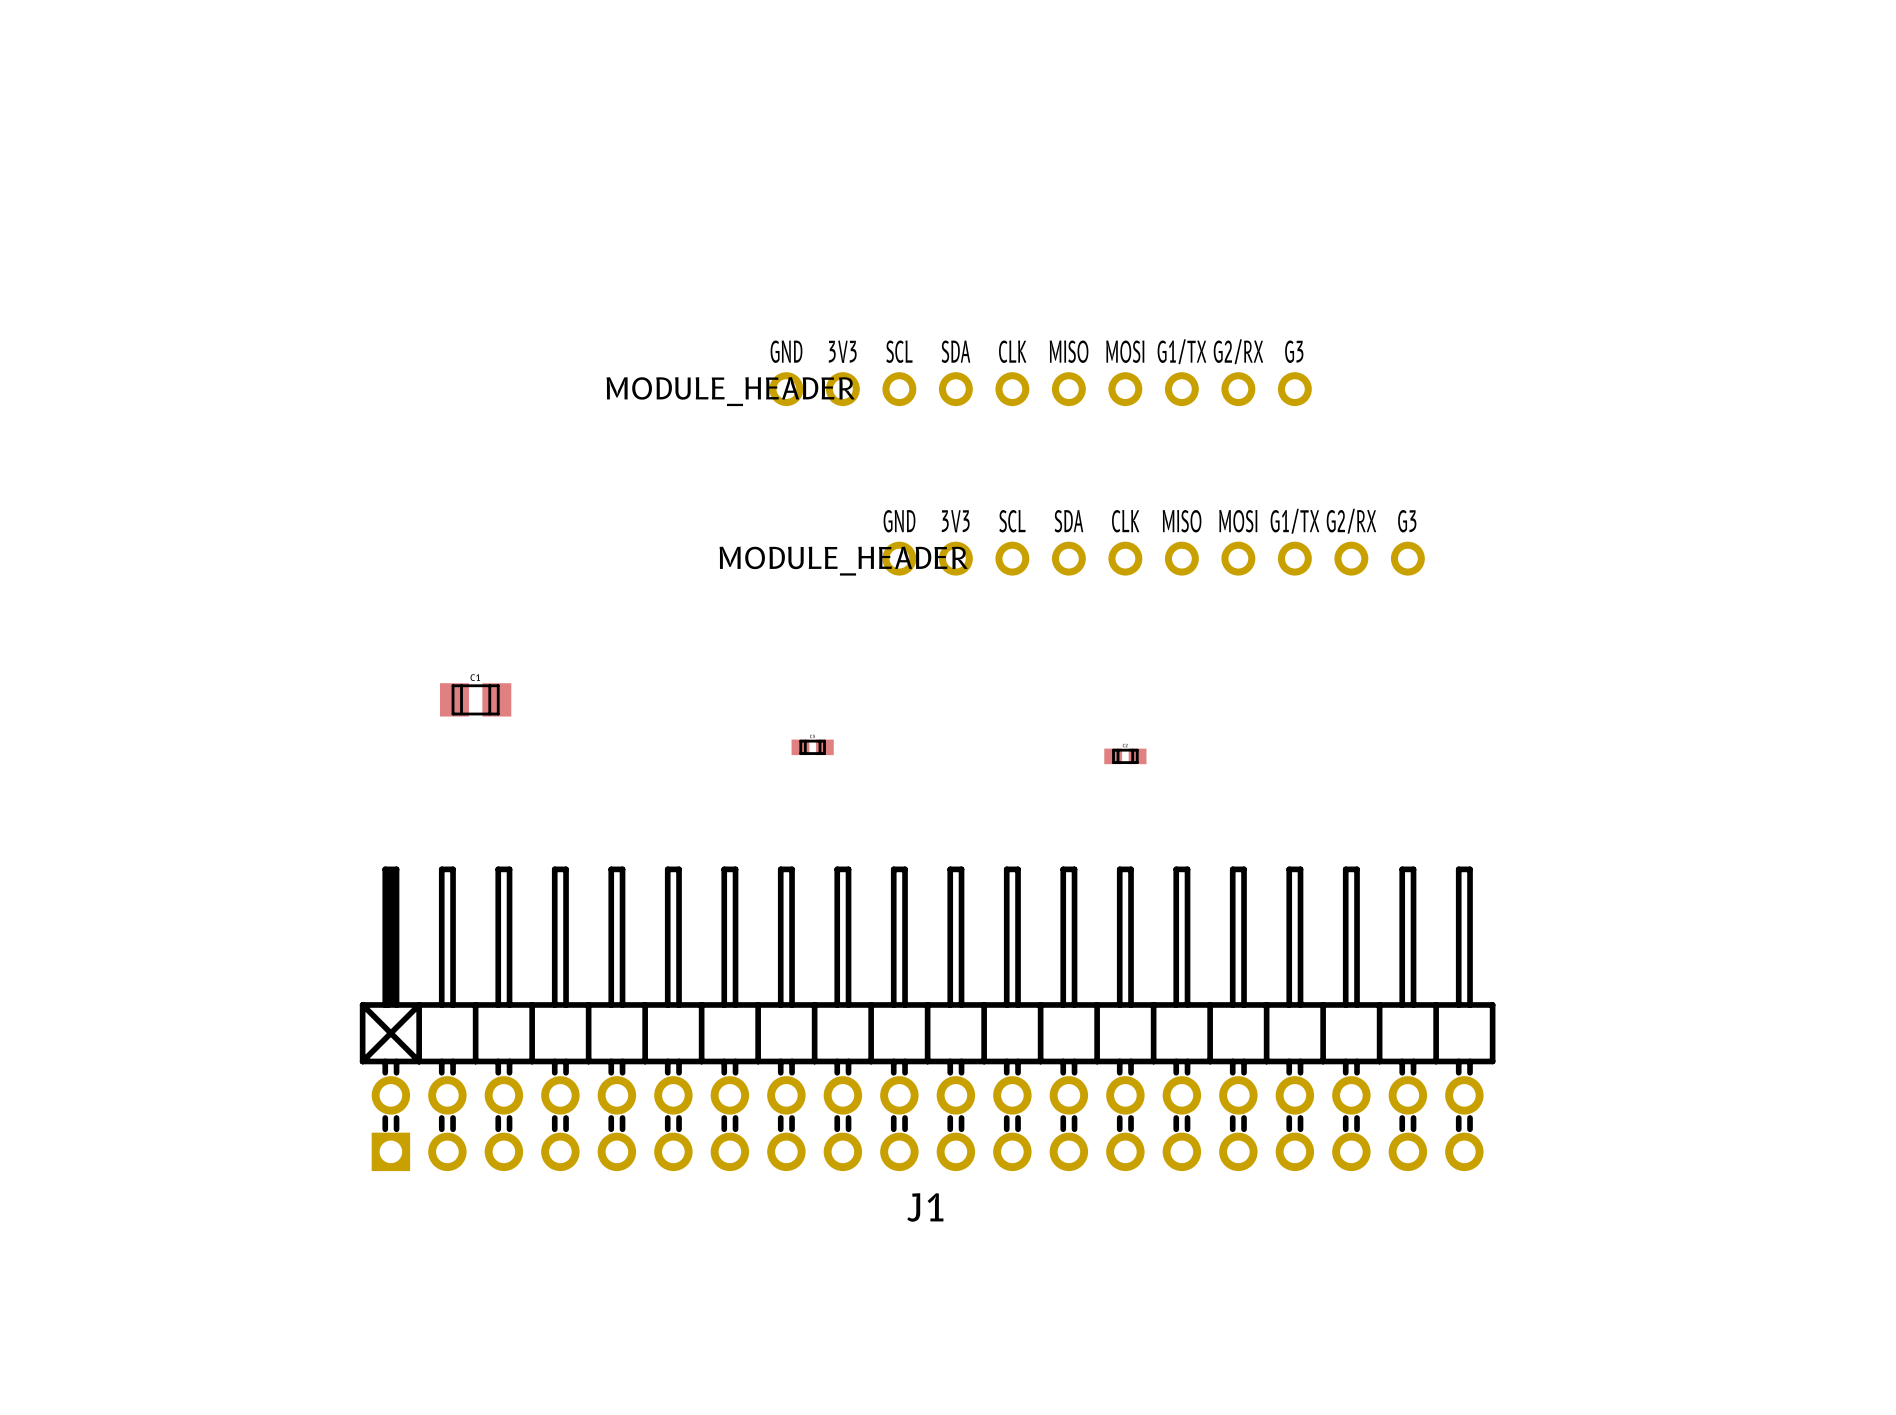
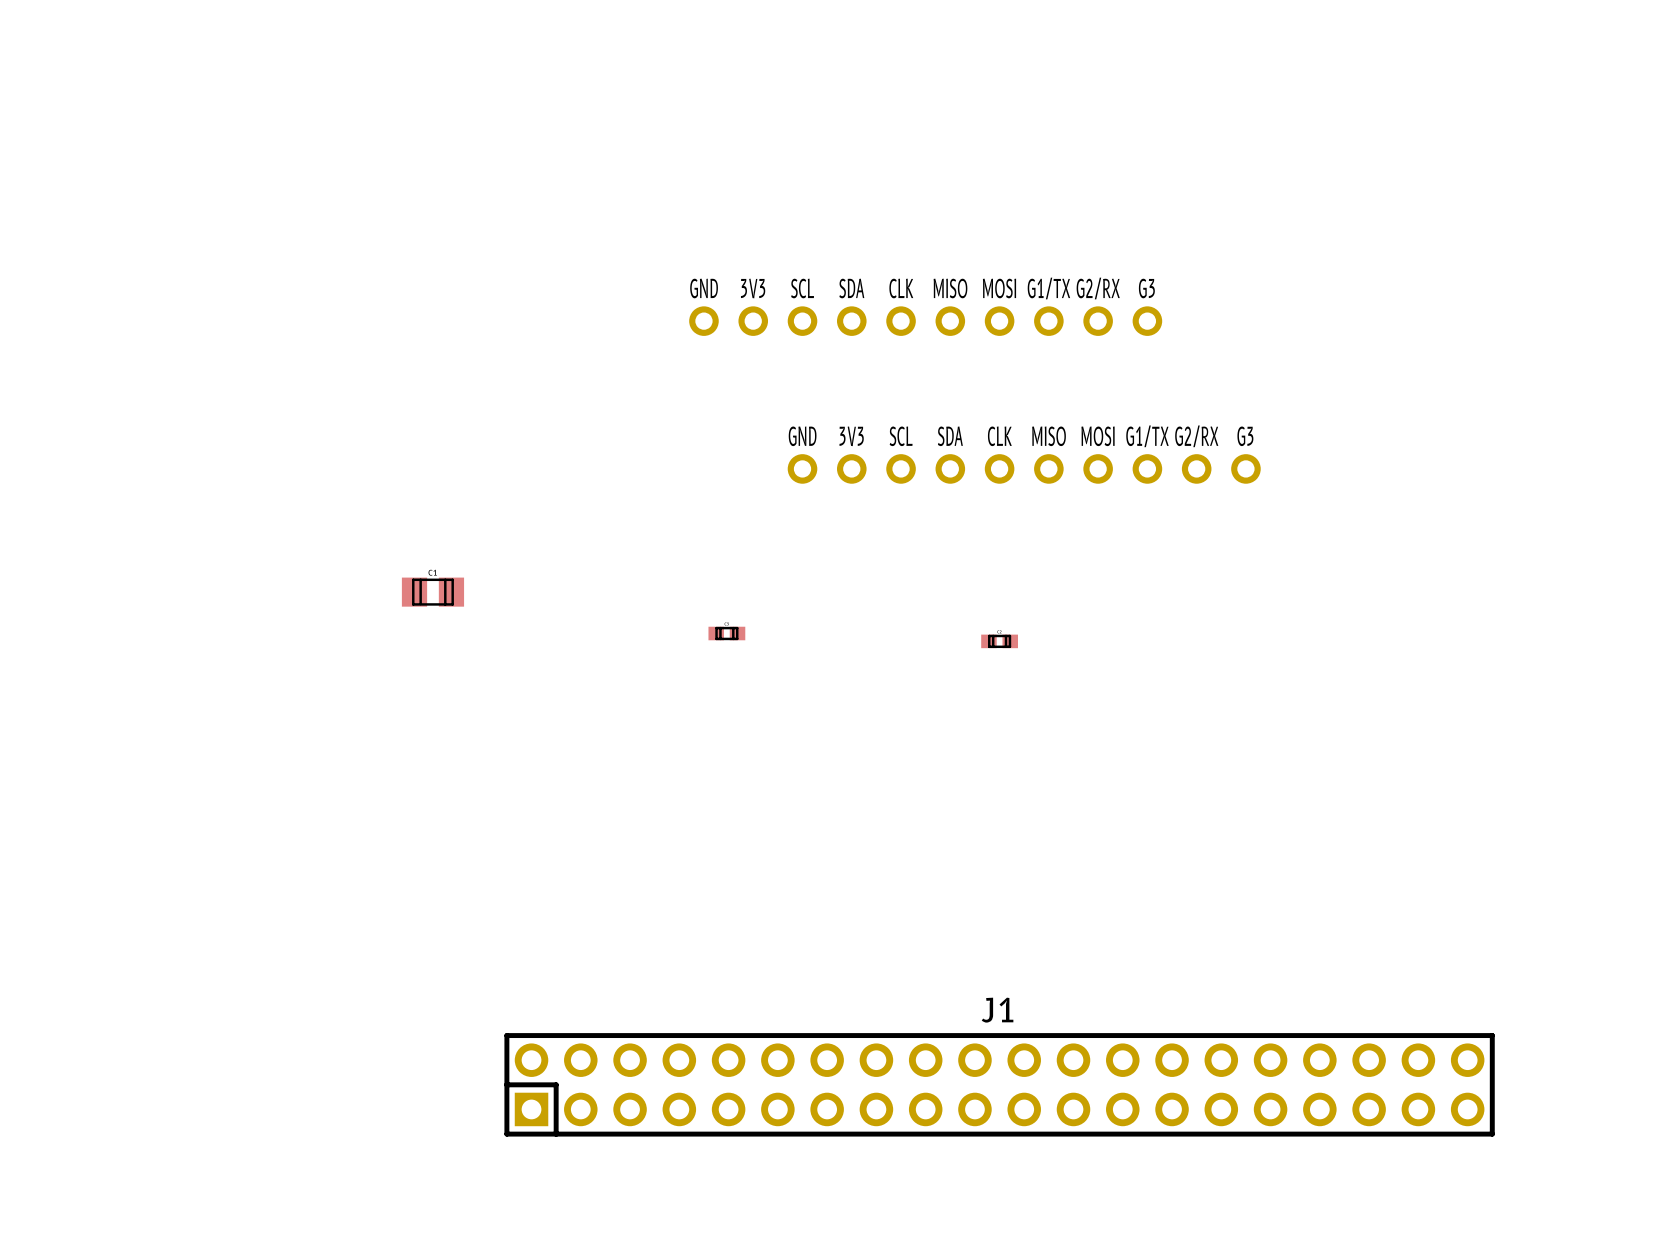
part value: MODULE_HEADER (730, 391) -> none
part value: MODULE_HEADER (843, 561) -> none
J1 footprint: [359, 866, 1496, 1172] -> [504, 1033, 1495, 1137]
J1 name position: J1 (925, 1207) -> J1 (997, 1010)

